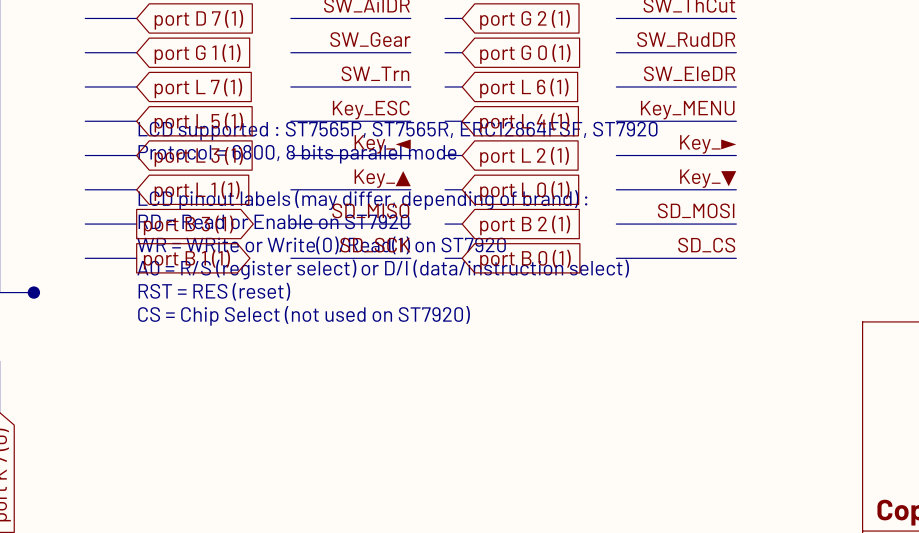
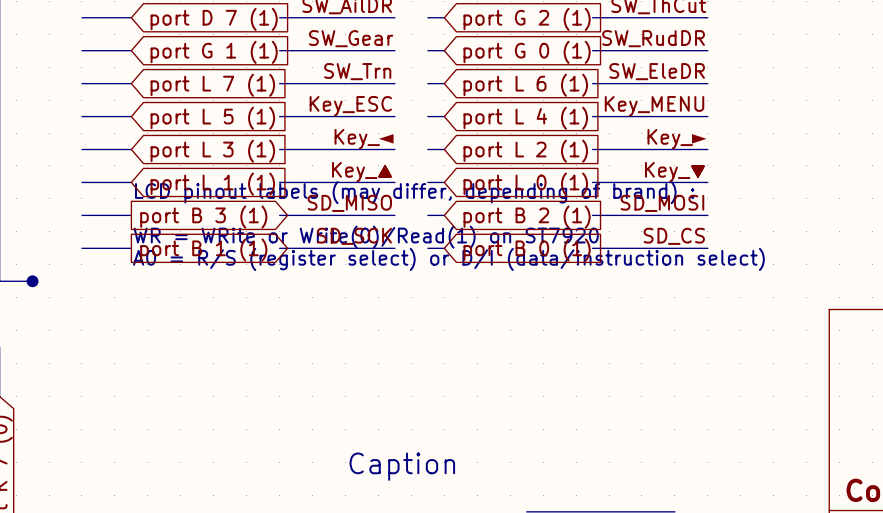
text: LCD supported : ST7565P, ST7565R, ERC12864FSF, ST7920 (398, 131) -> none
text: Protocol = 6800, 8 bits parallel mode (297, 154) -> none
text: RD = Read or Enable on ST7920 (274, 221) -> none
text: RST = RES (reset) (214, 291) -> none
text: CS = Chip Select (not used on ST7920) (304, 315) -> none
text: none -> Caption (402, 466)
wire: none -> (526, 511) (674, 511)

